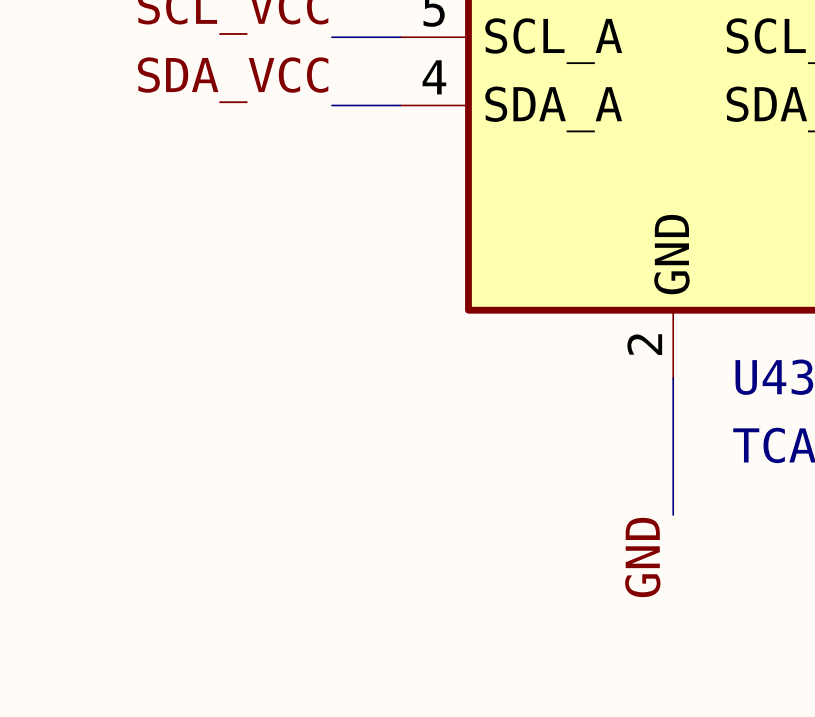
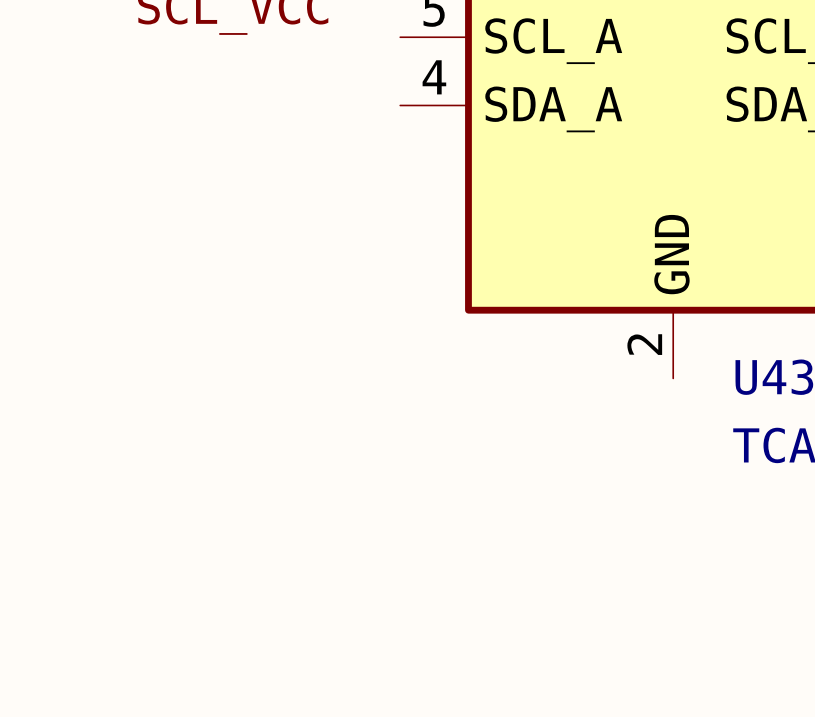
wire: (331, 37) (400, 37) -> none
label: SDA_VCC (233, 80) -> none
wire: (331, 105) (400, 105) -> none
wire: (673, 378) (673, 514) -> none
label: GND (642, 557) -> none

